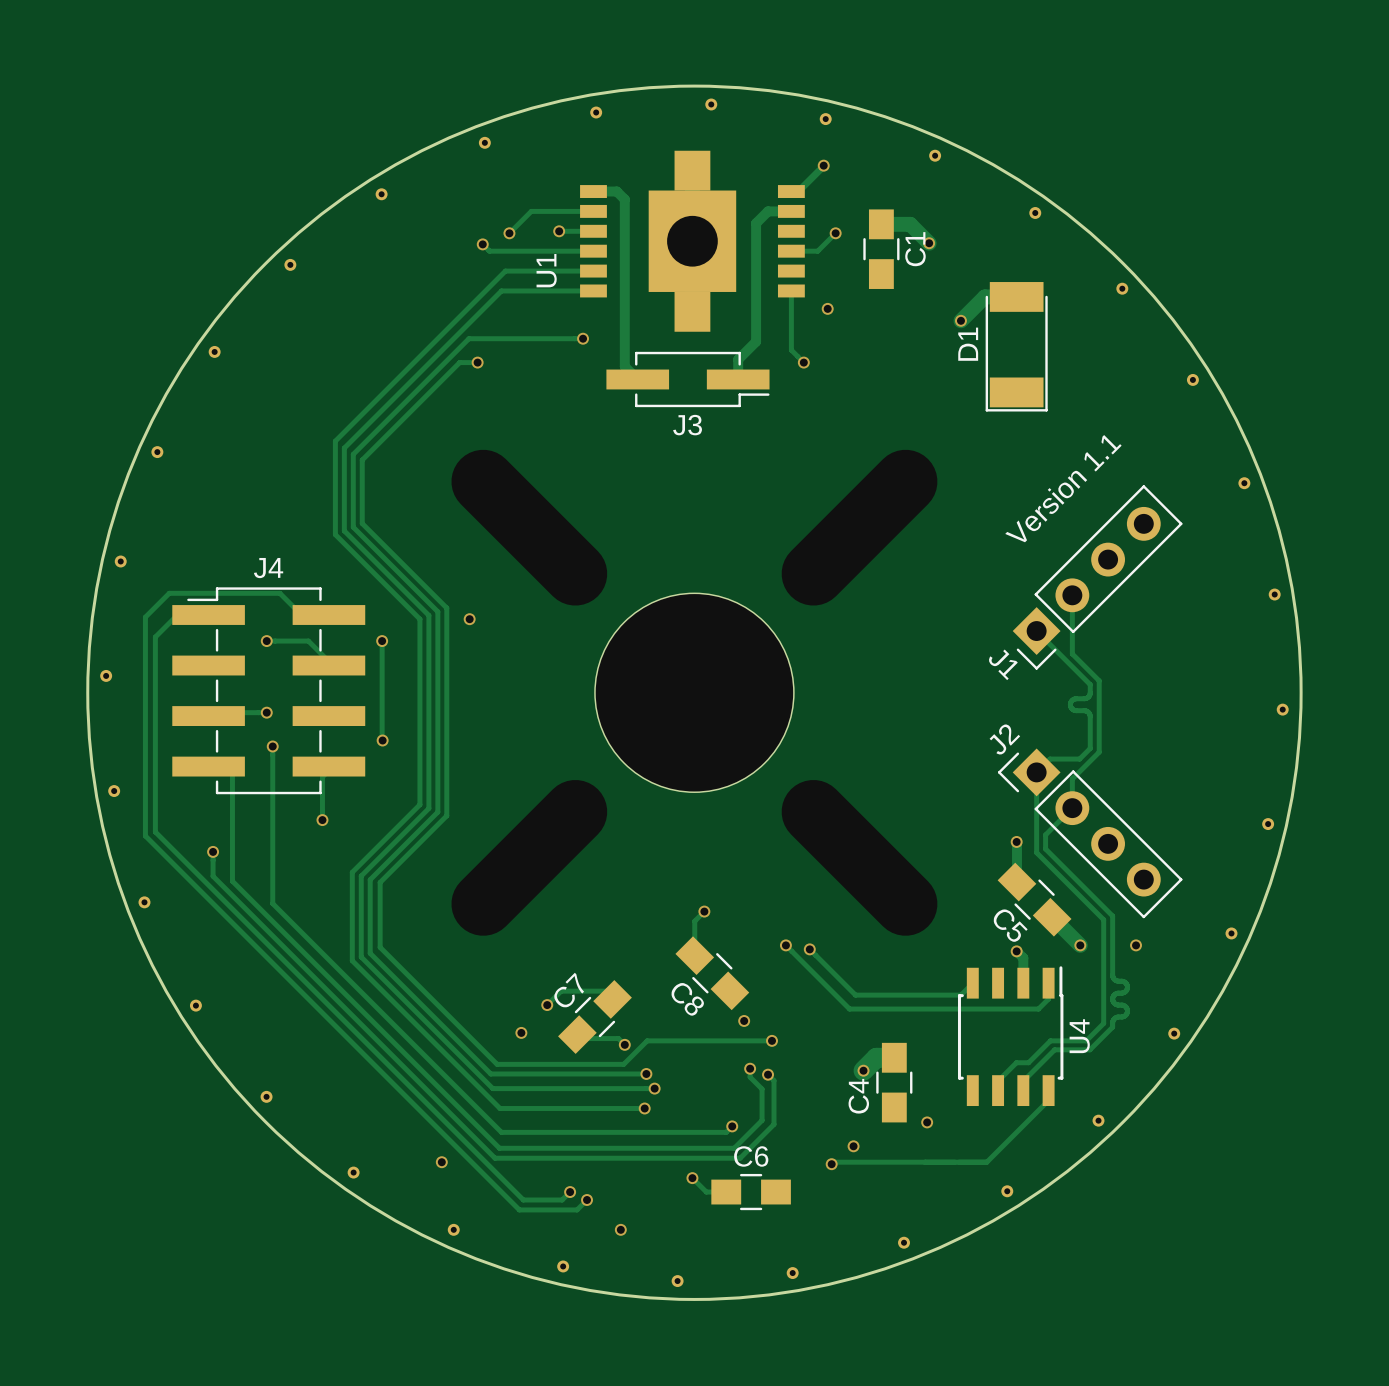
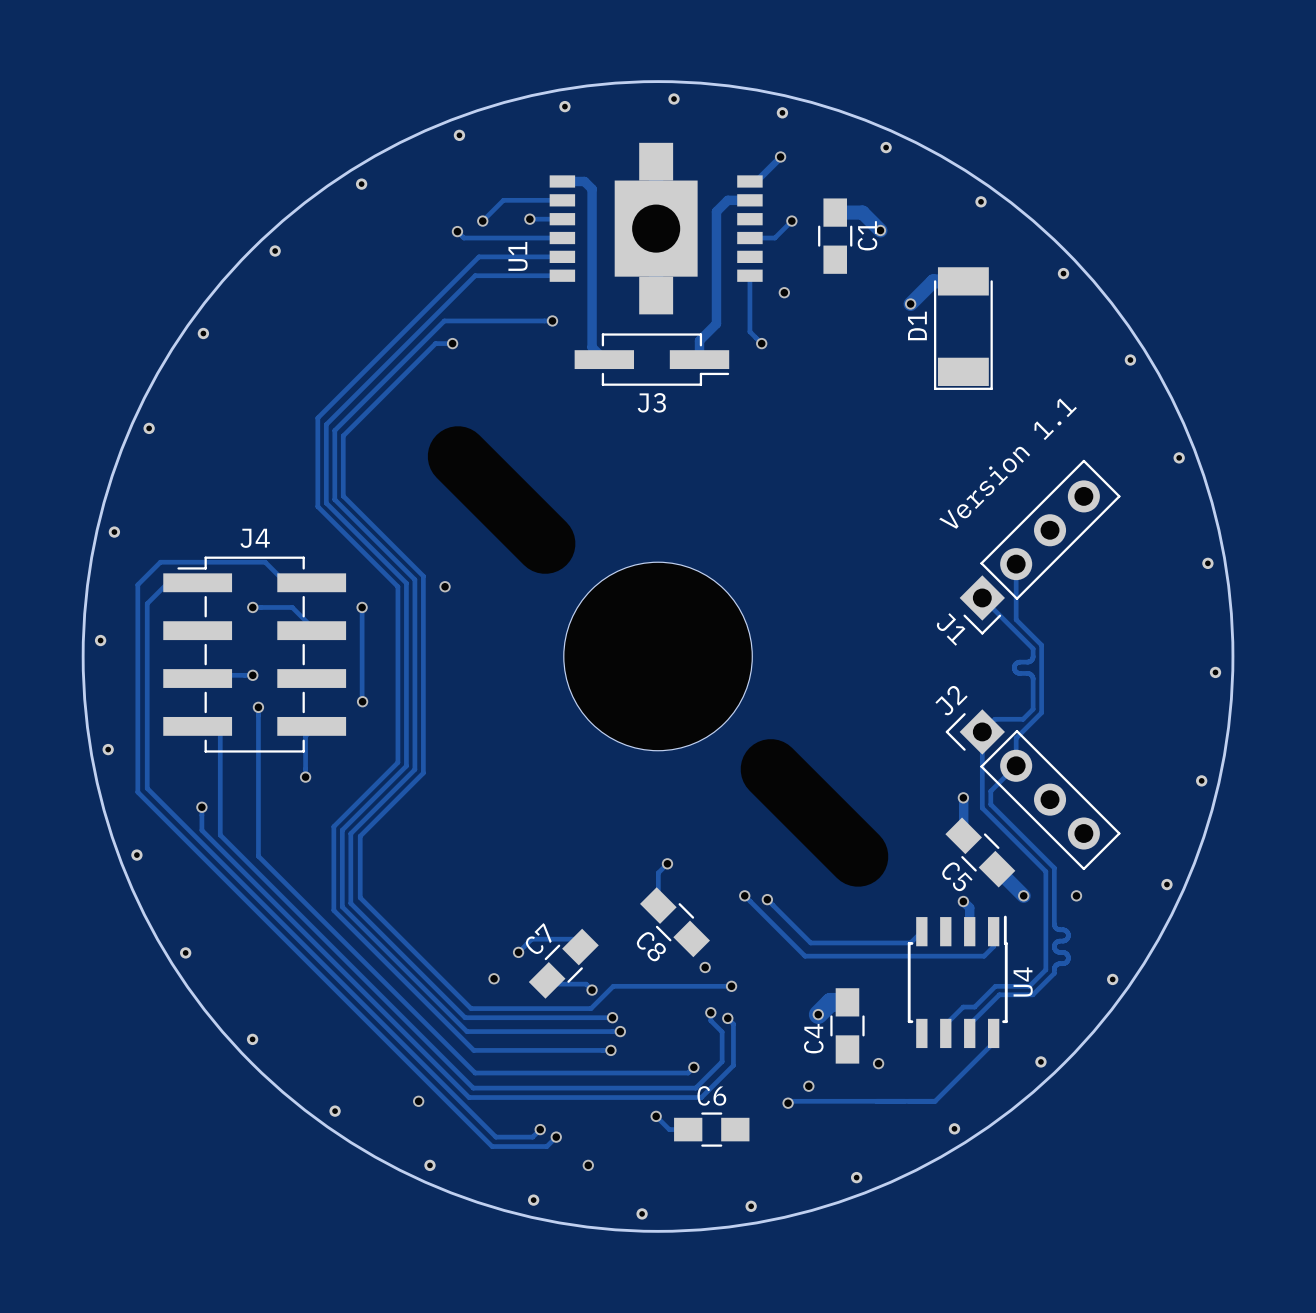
part: (859, 527) -> none
part: (529, 857) -> none

